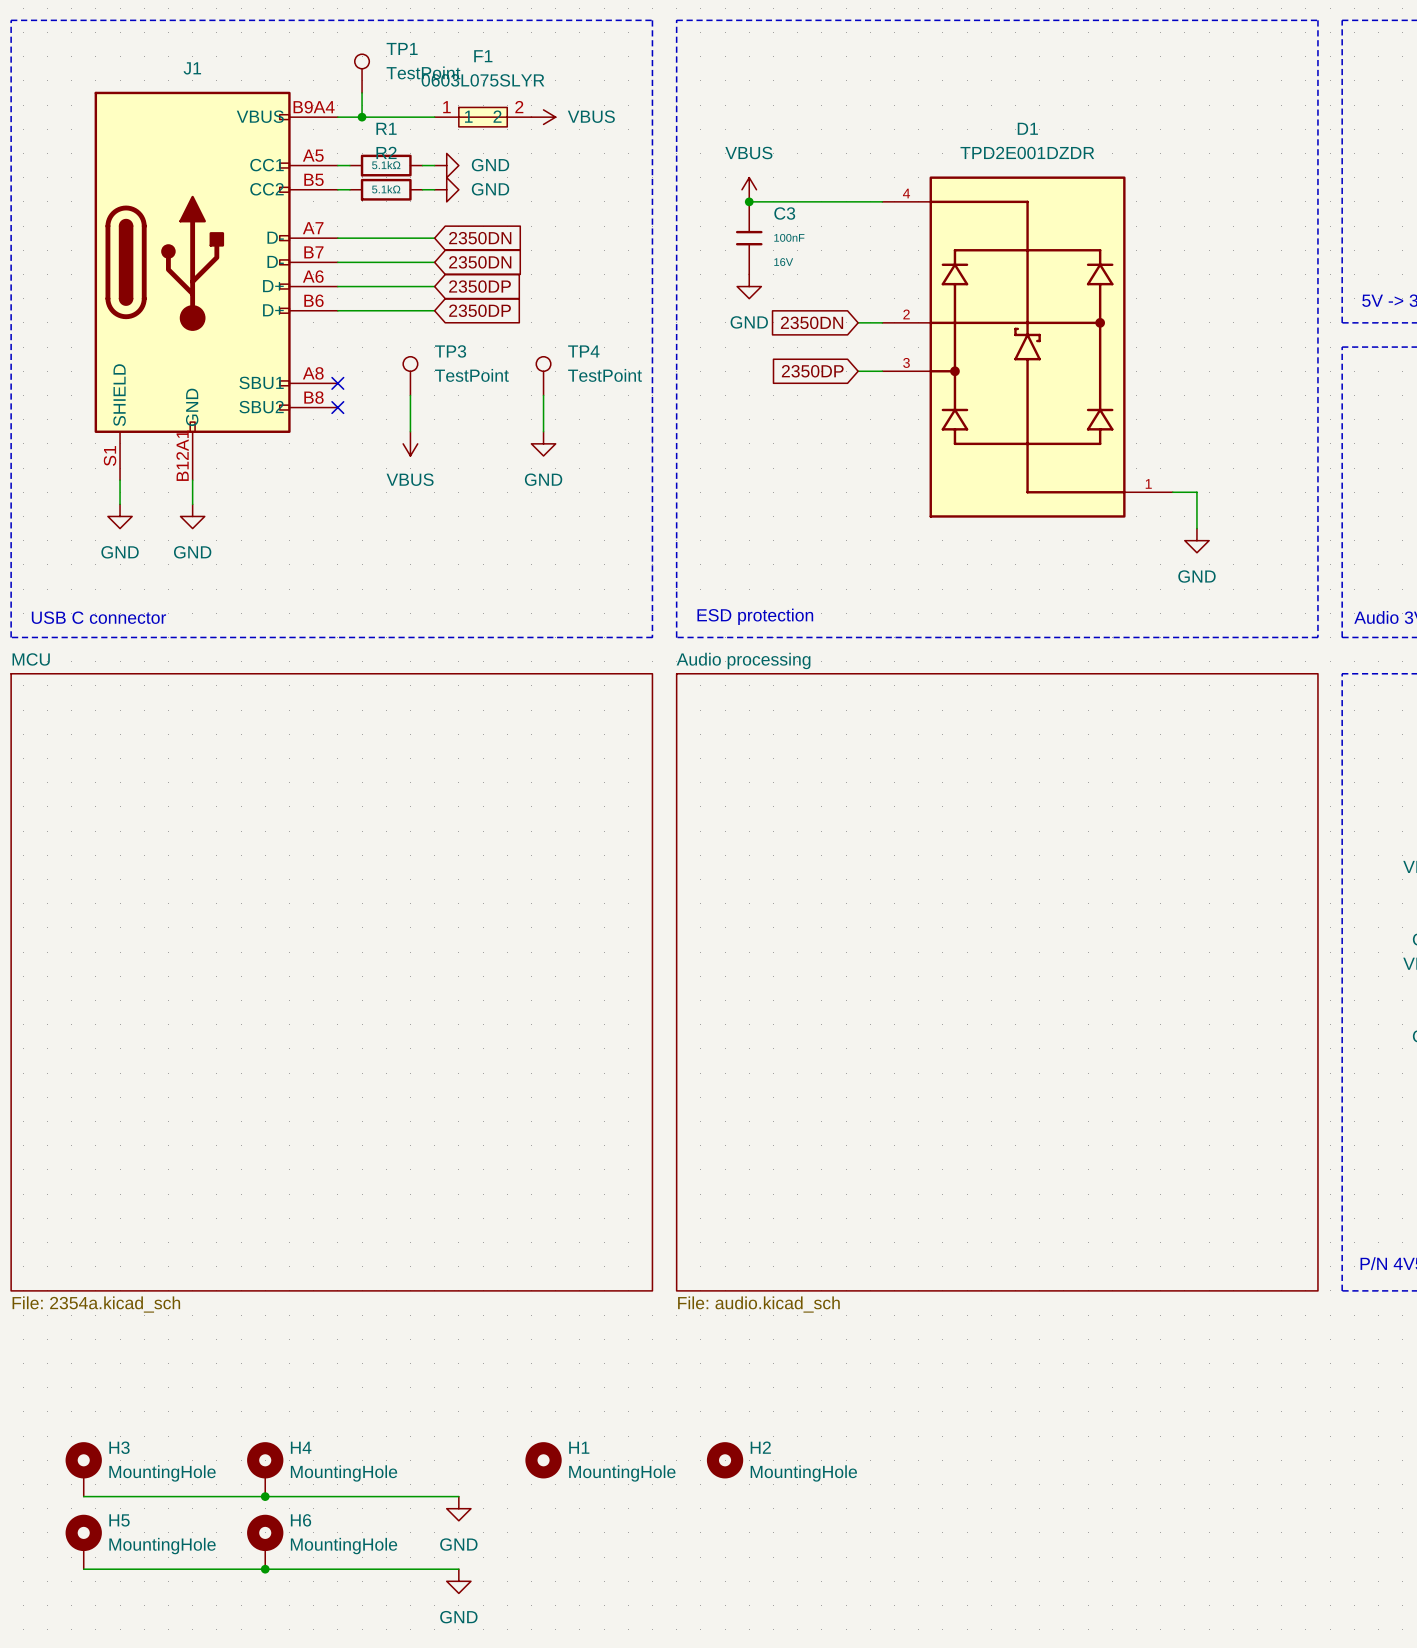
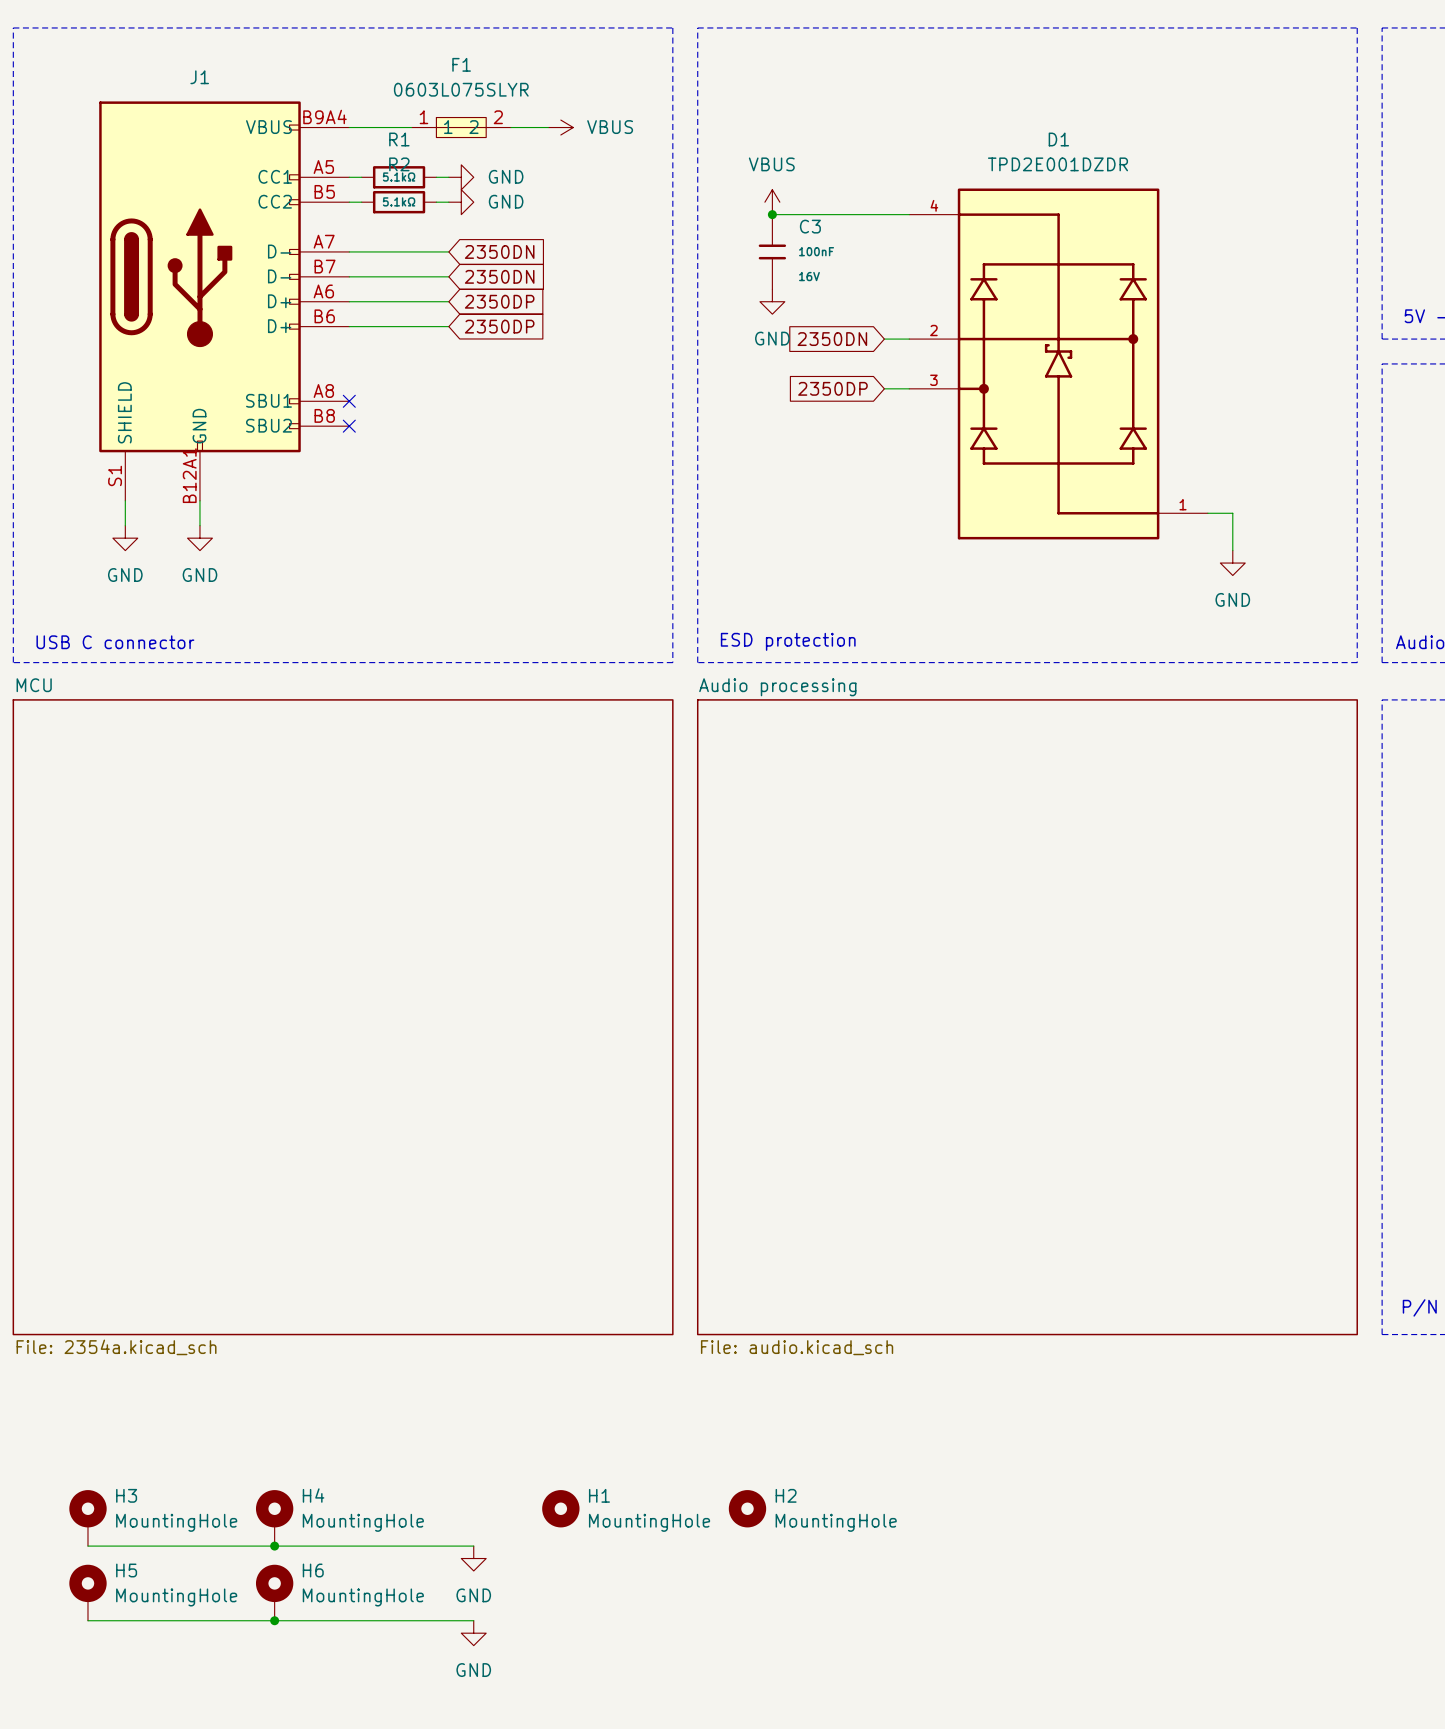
TP1: TestPoint (362, 73) -> none
wire: (362, 92) (362, 117) -> none
junction: (362, 117) -> none
F1 position: (483, 117) -> (461, 127)
TP3: TestPoint (410, 376) -> none
TP4: TestPoint (543, 376) -> none
wire: (410, 395) (410, 431) -> none
wire: (543, 395) (543, 431) -> none
power symbol: VBUS (410, 443) -> none
power symbol: GND (543, 443) -> none

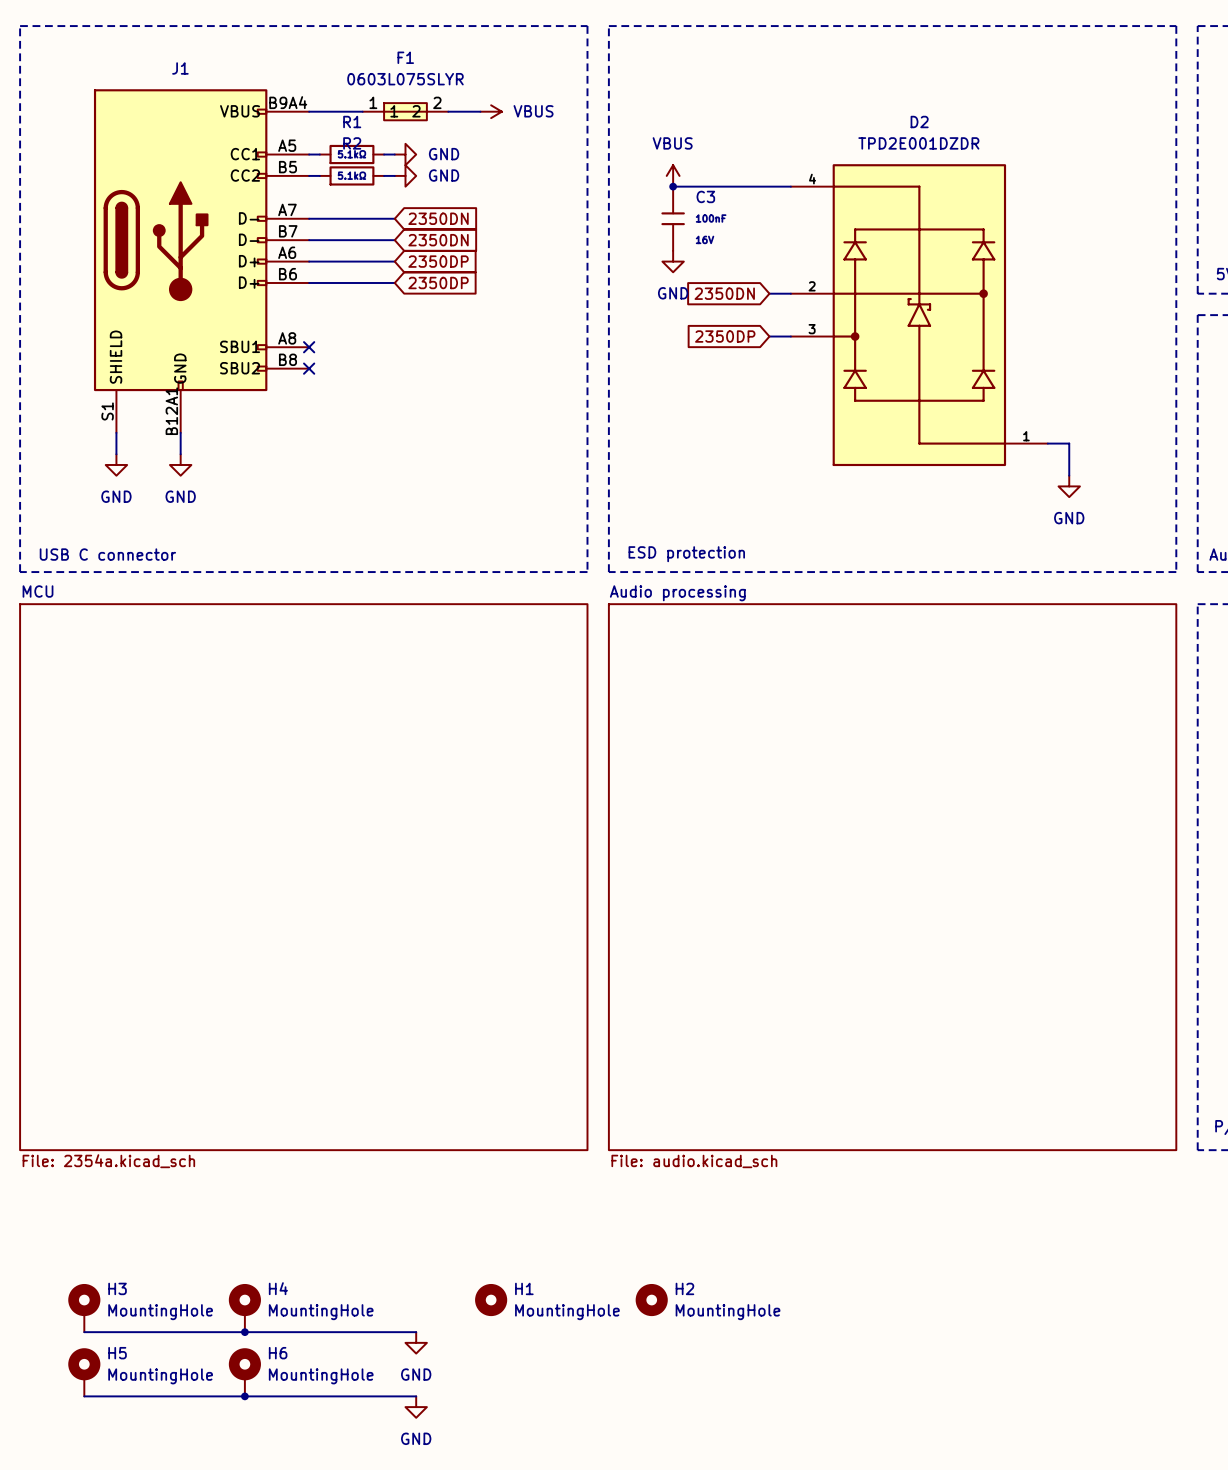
D1 name: D1 (1058, 139) -> D2 (919, 122)

